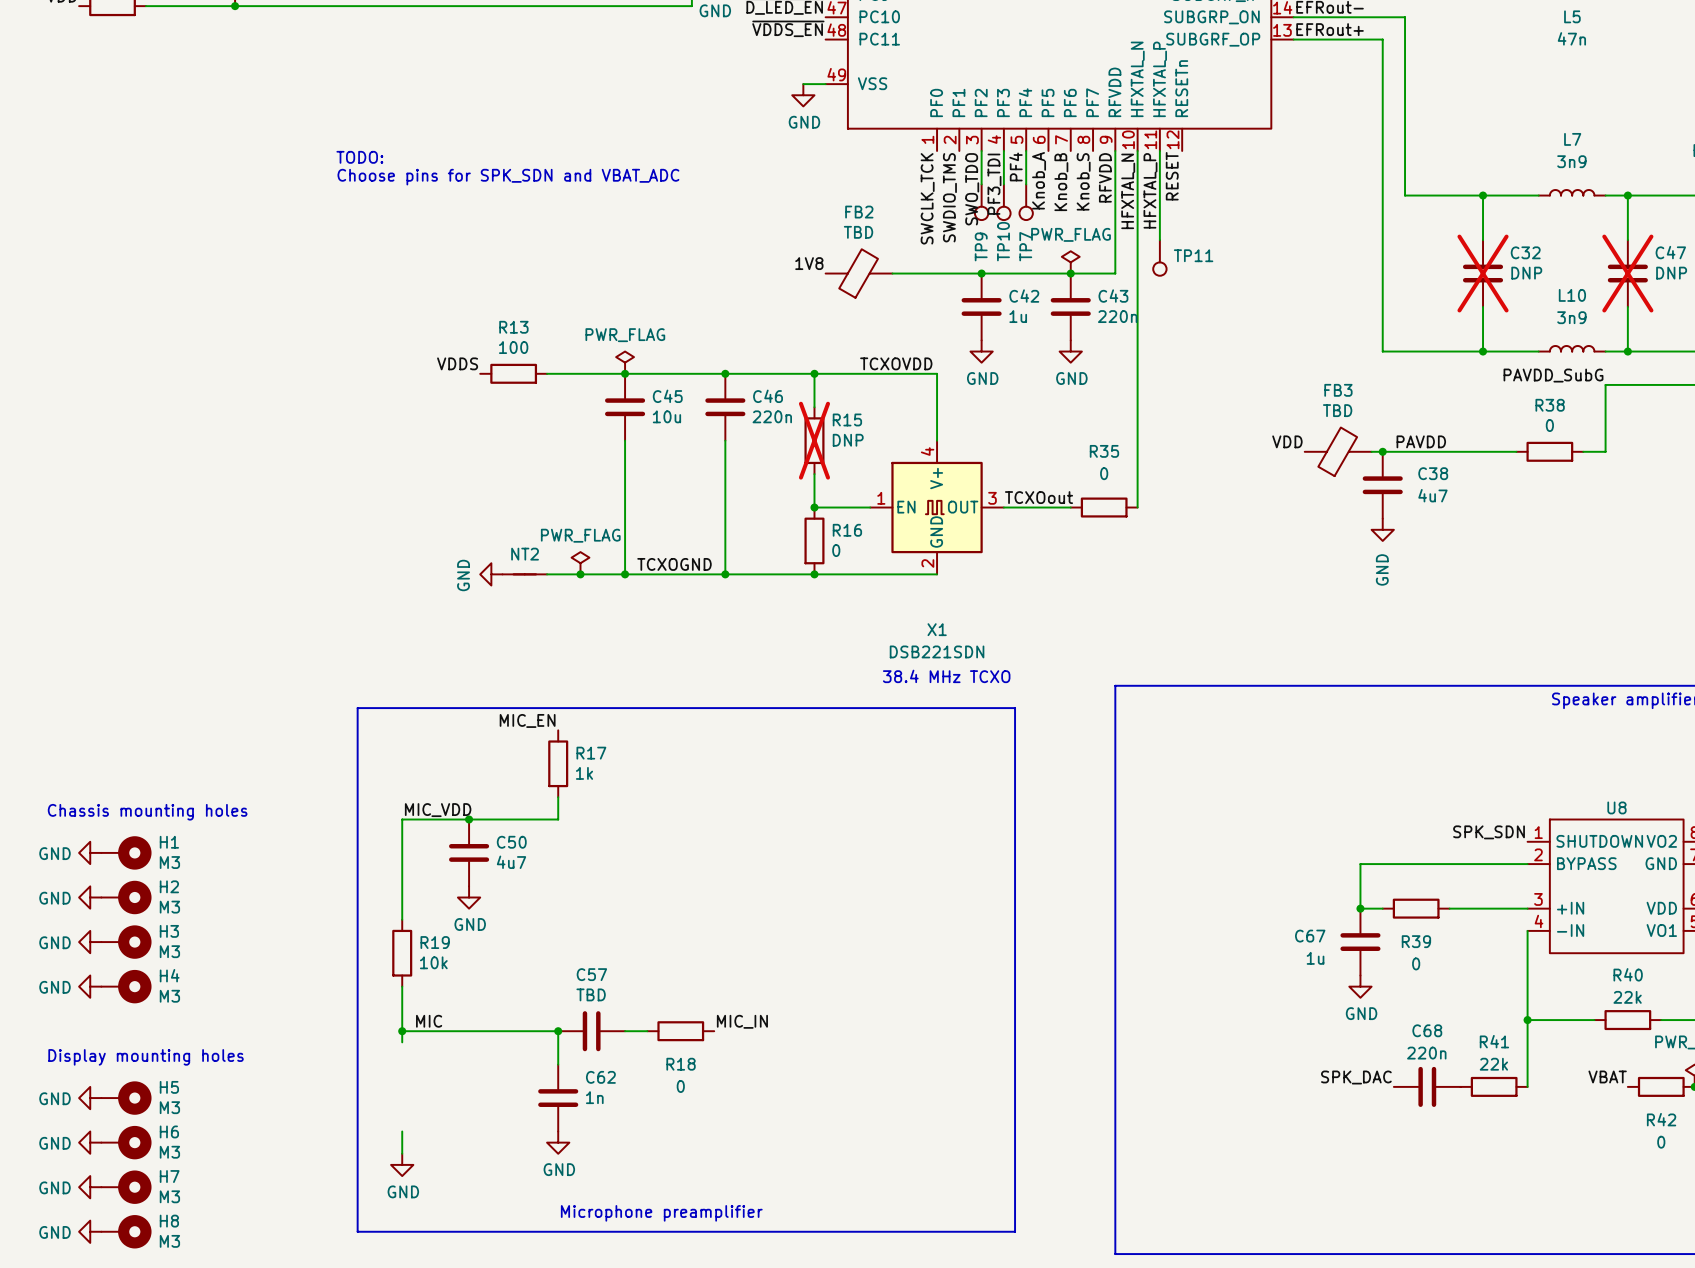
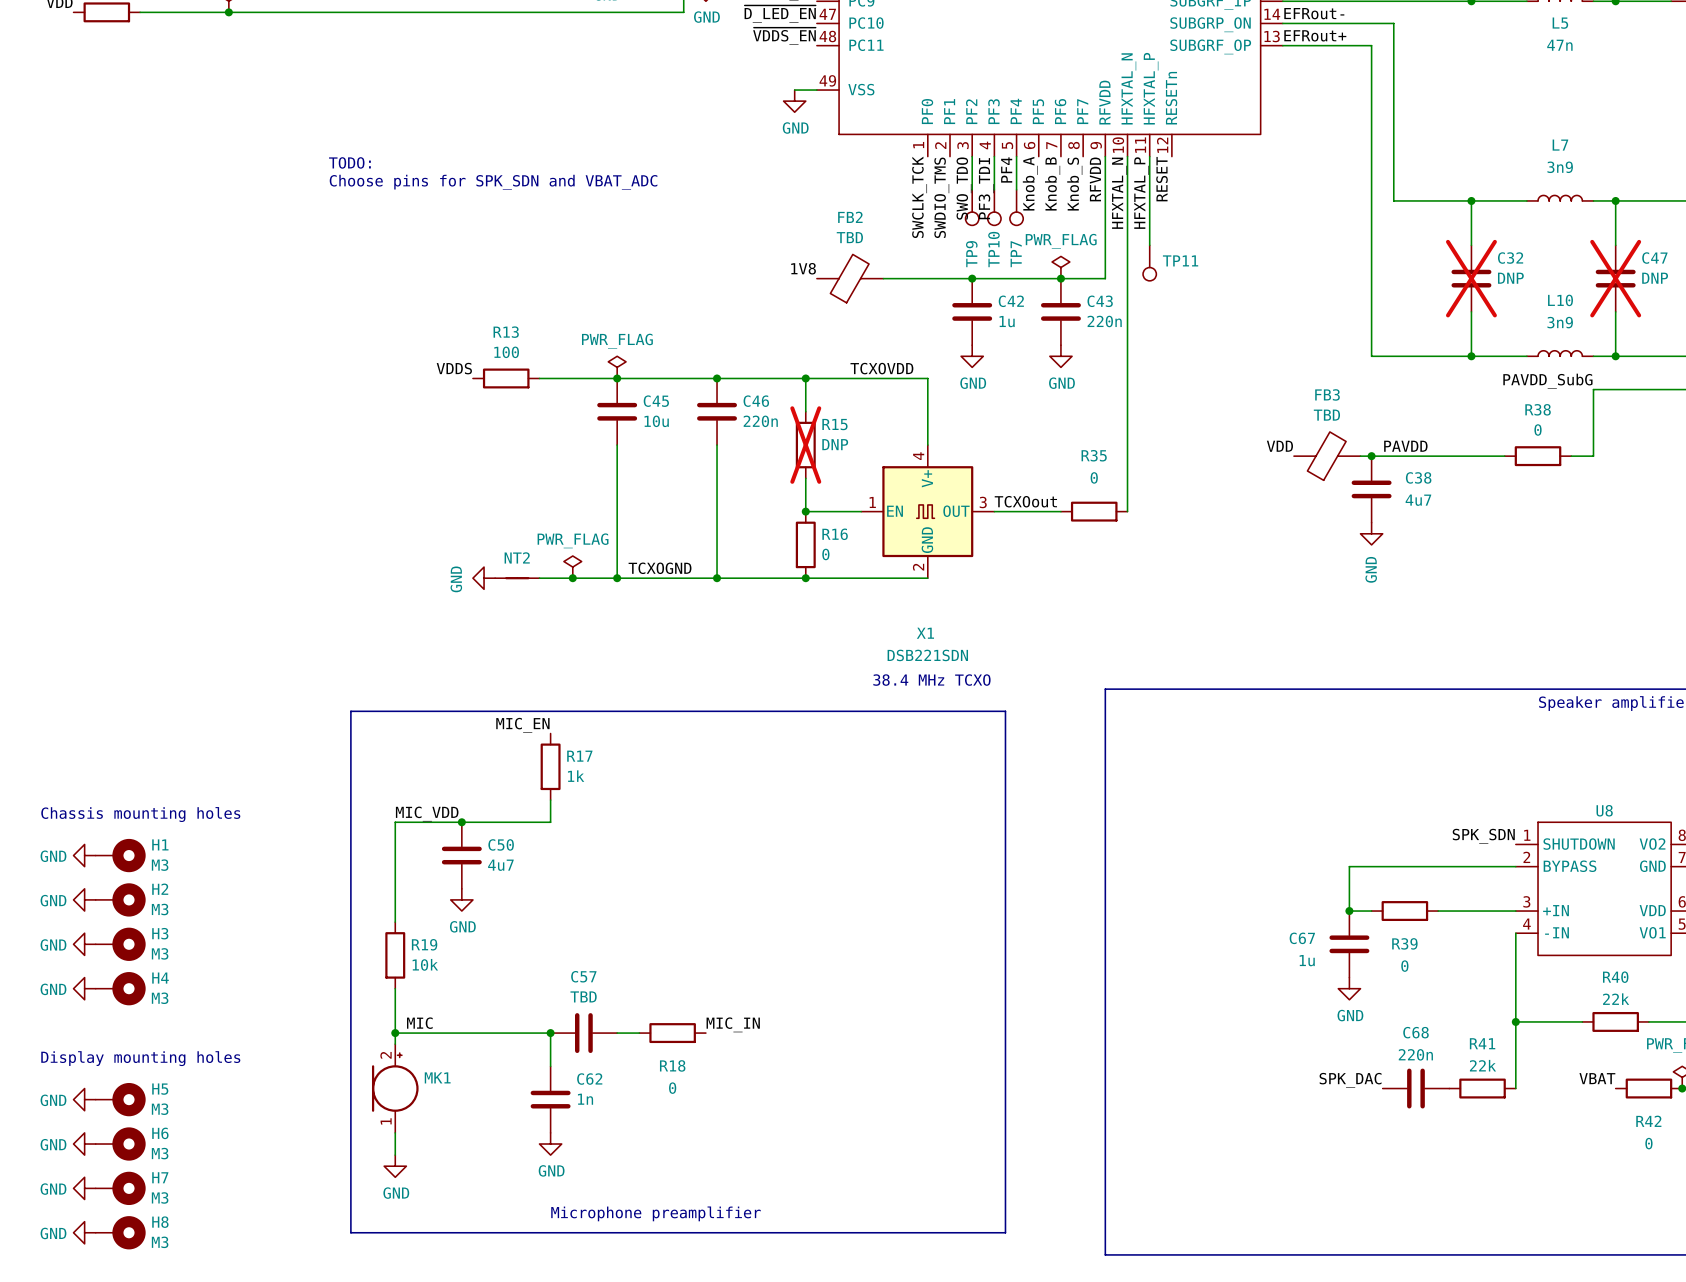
MK1: none -> (395, 1088)

